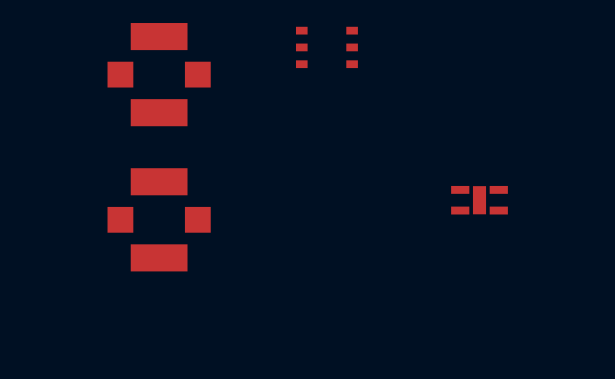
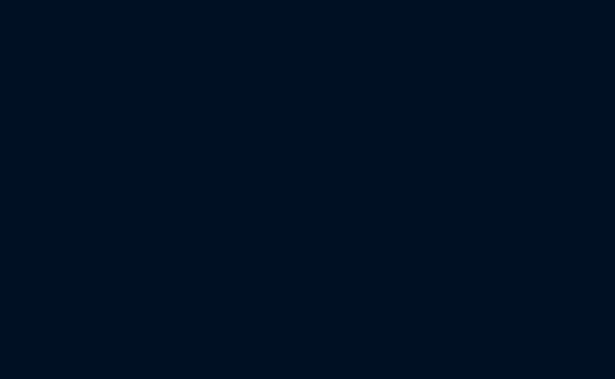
part: (326, 47) -> none
part: (159, 74) -> none
part: (479, 200) -> none
part: (159, 219) -> none

